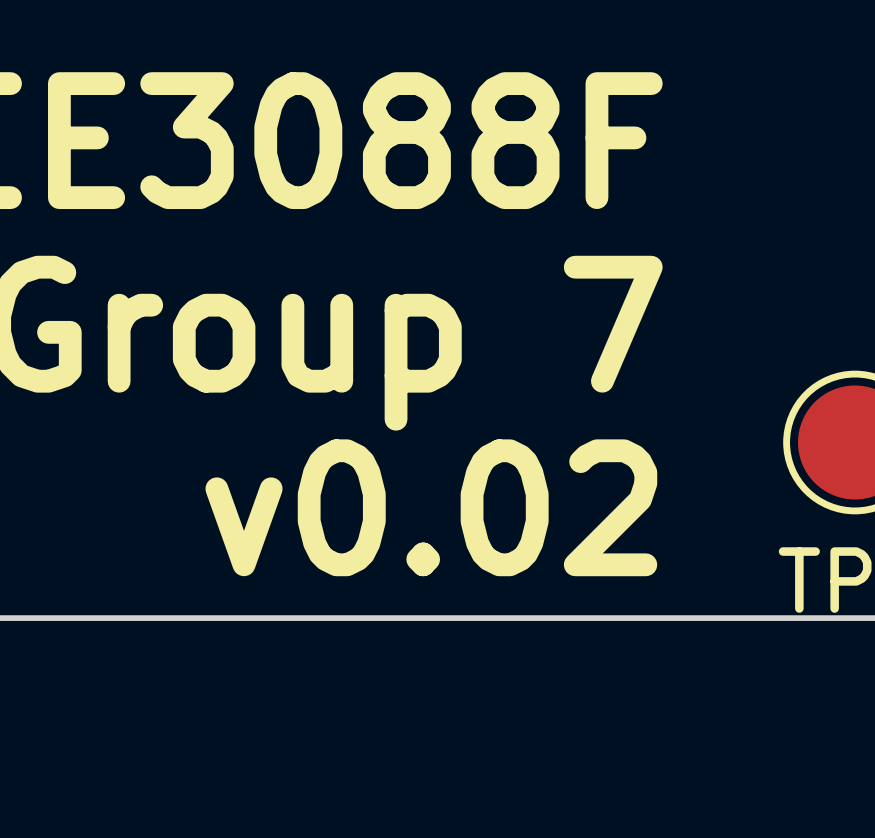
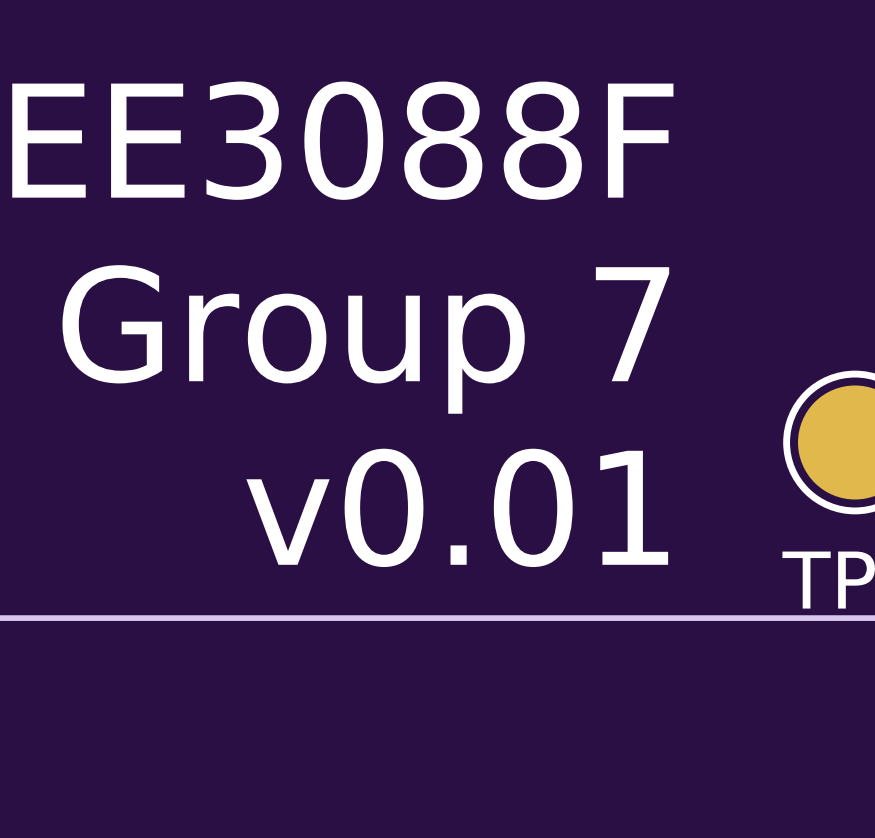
text: v0.02 (431, 507) -> v0.01 (457, 507)

